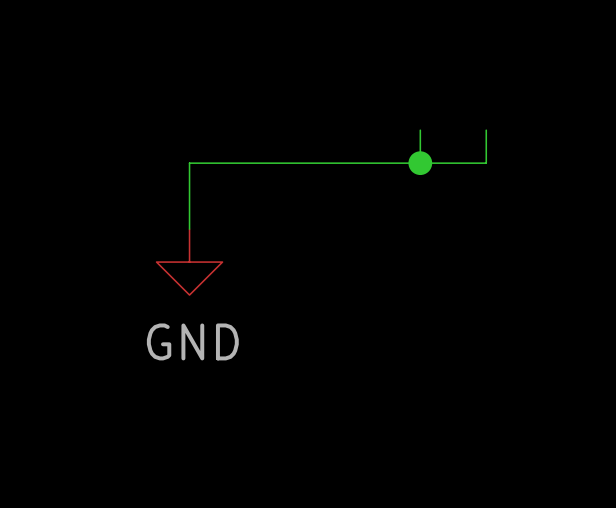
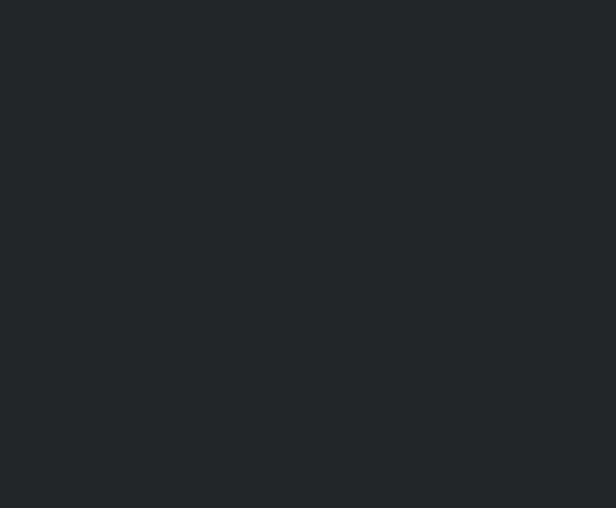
wire: (420, 130) (420, 163) -> none
wire: (486, 130) (486, 163) (189, 163) (189, 229) -> none
junction: (420, 163) -> none
power symbol: GND (189, 262) -> none

